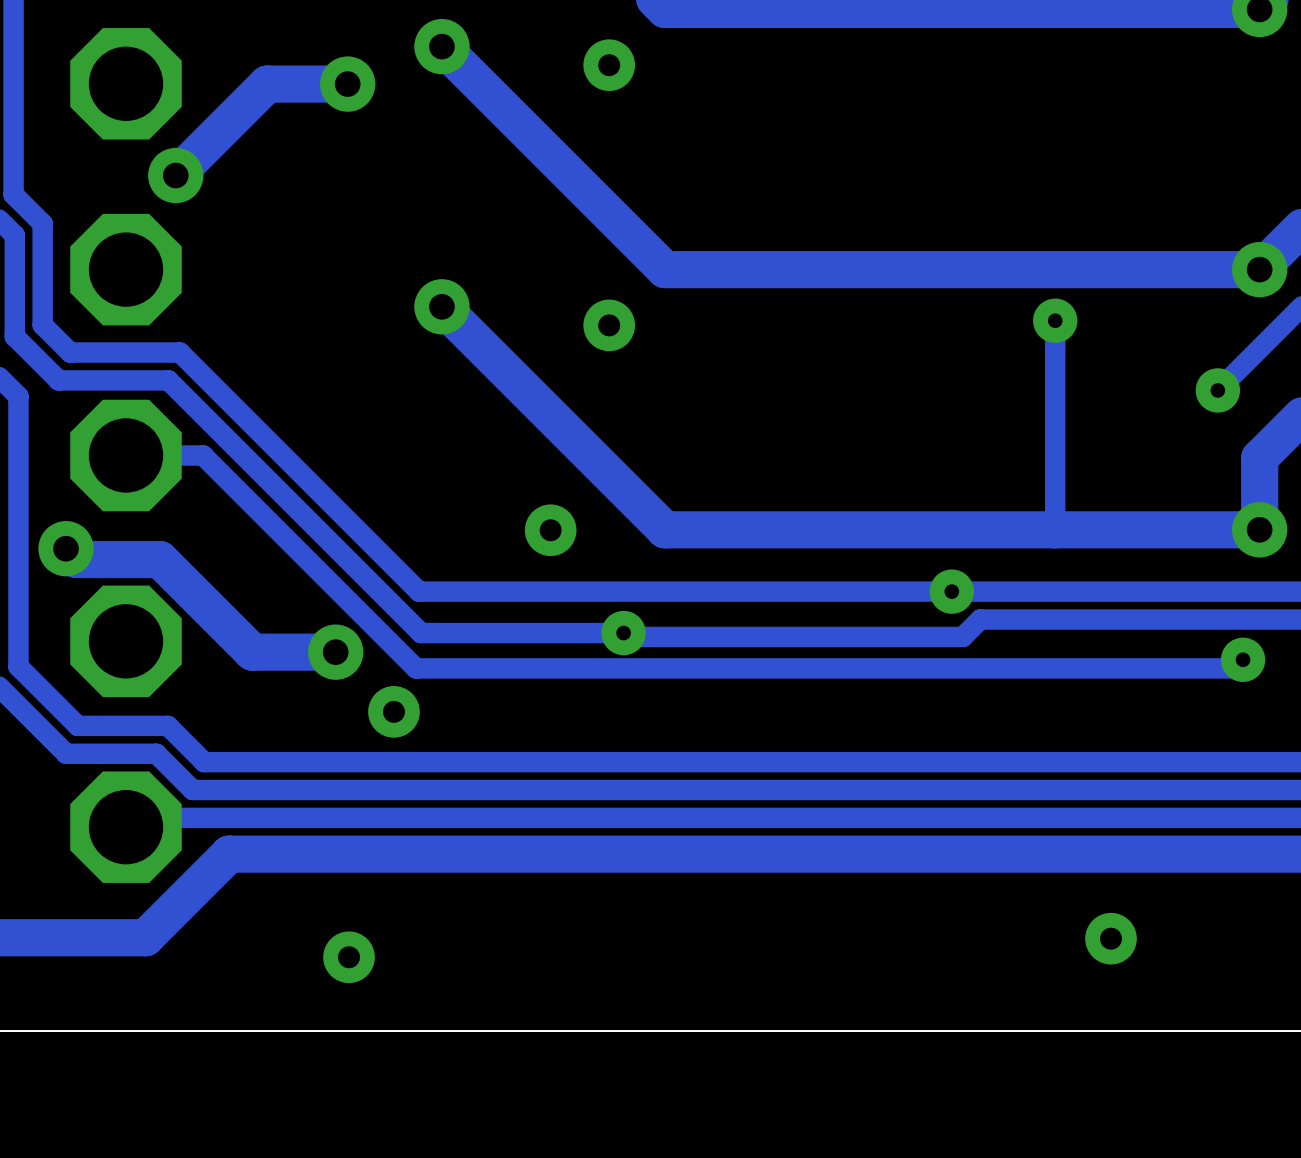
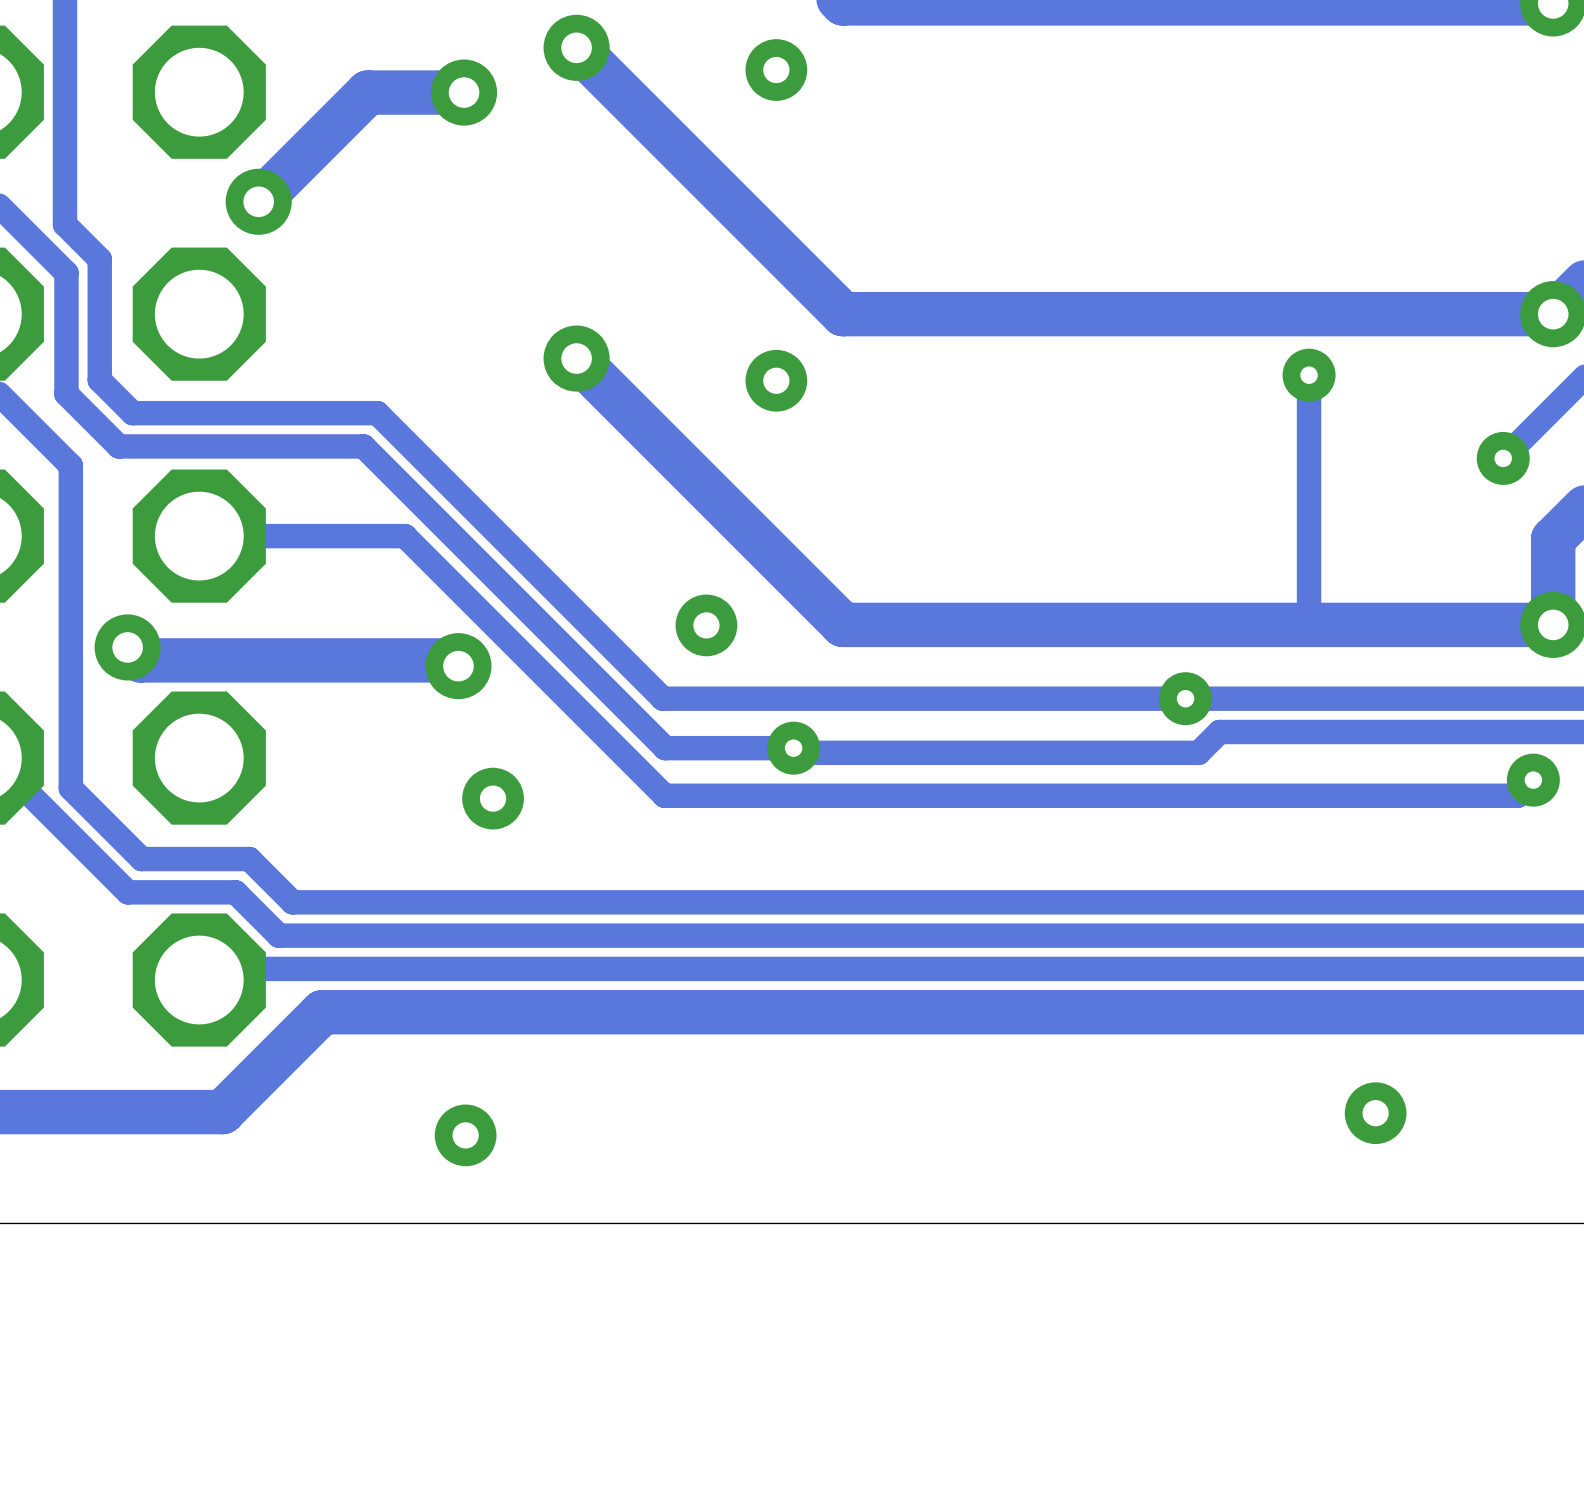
track: (179, 352) (419, 591) (514, 591) -> (263, 413) (377, 413) (662, 698)
track: (168, 380) (421, 633) (516, 633) -> (249, 446) (363, 446) (665, 748)
track: (203, 455) (416, 668) (1234, 668) -> (291, 536) (404, 536) (664, 795) (1517, 795) (1523, 790)
track: (159, 559) (252, 652) (335, 652) -> (239, 660) (452, 660) (458, 666)
via position: (335, 652) -> (458, 666)
via position: (393, 711) -> (493, 798)

